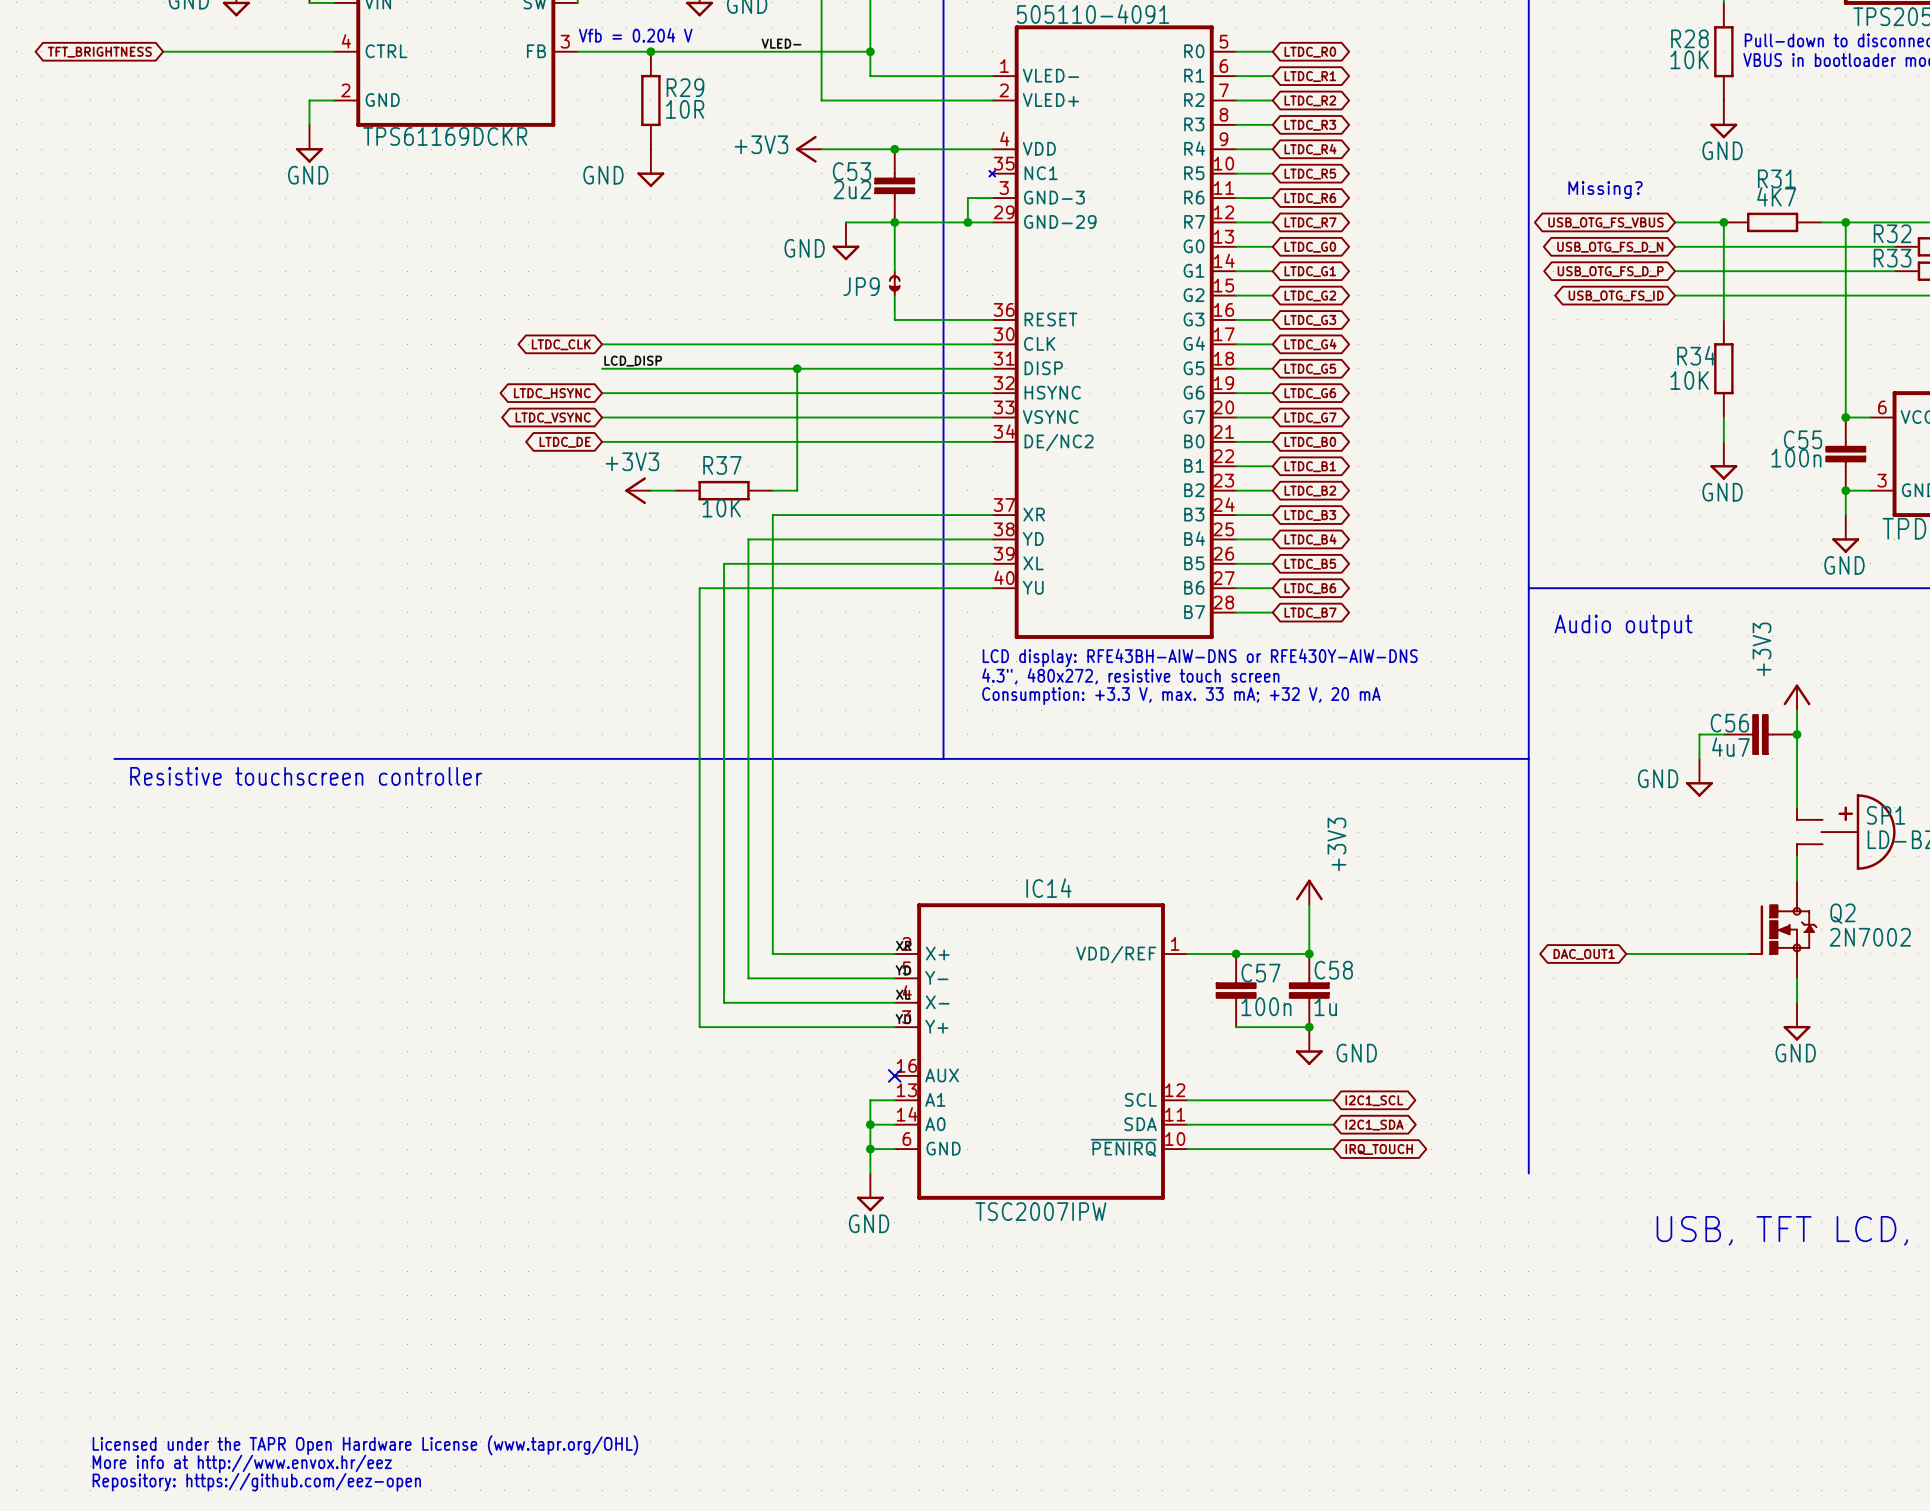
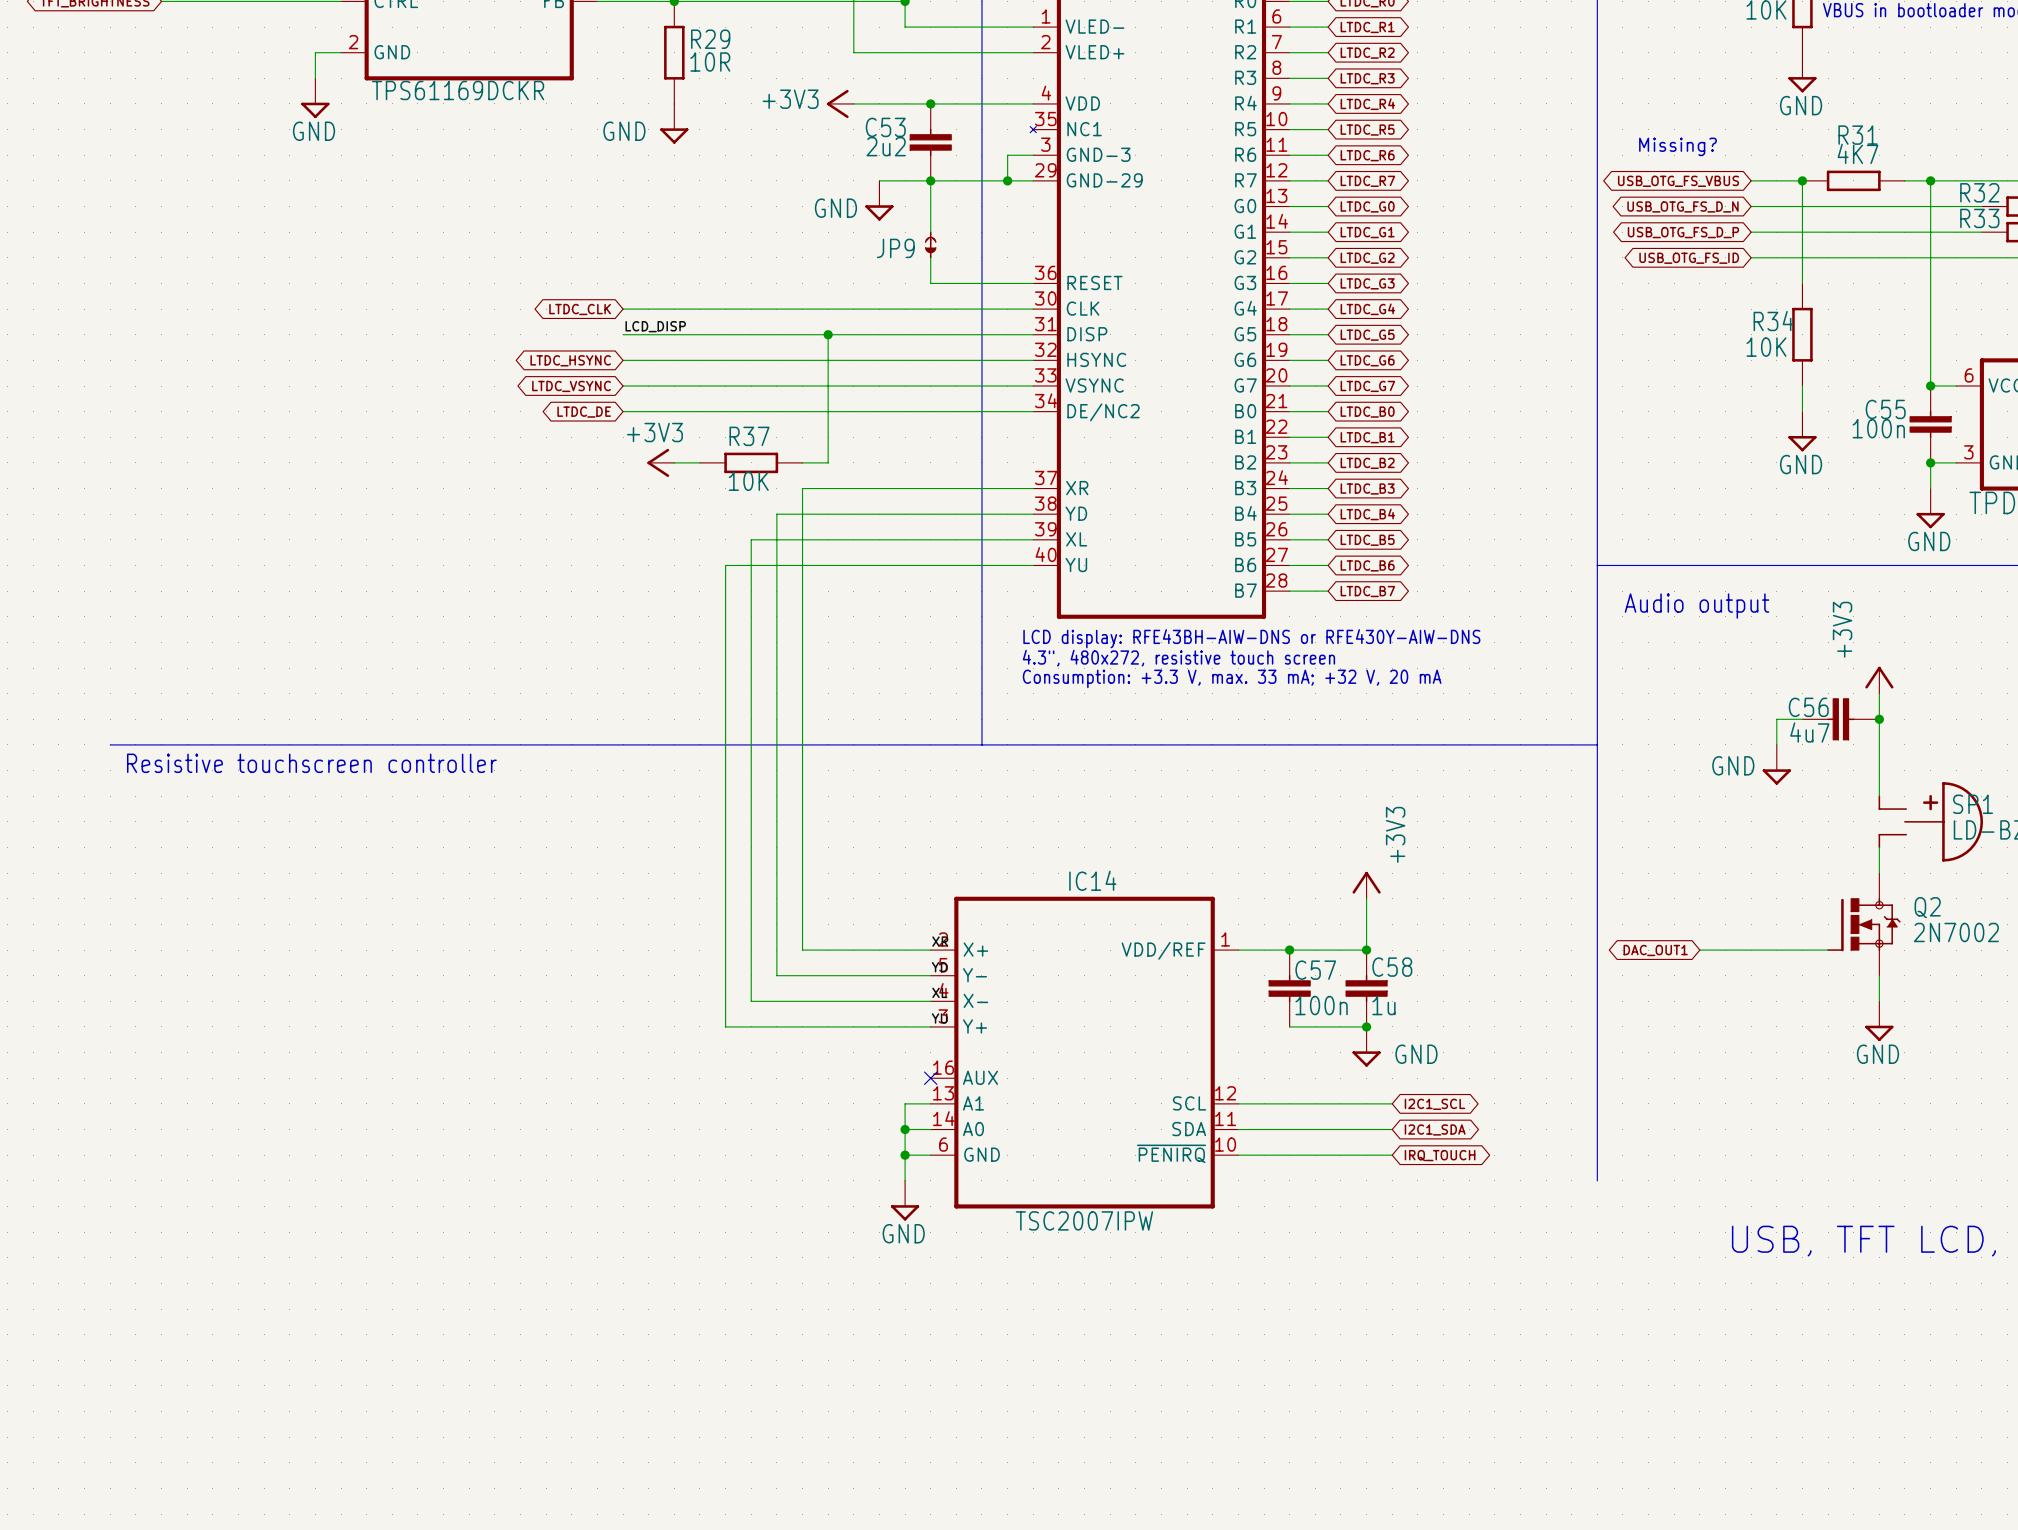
text: Licensed under the TAPR Open Hardware License (www.tapr.org/OHL) (365, 1445) -> none
text: More info at http://www.envox.hr/eez (242, 1463) -> none
text: Repository: https://github.com/eez-open (256, 1482) -> none

